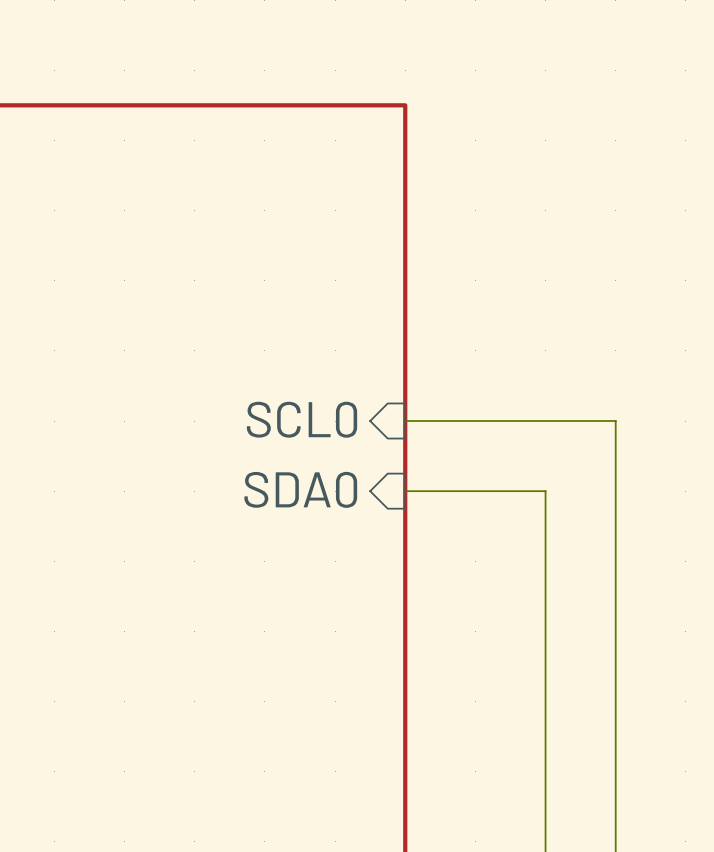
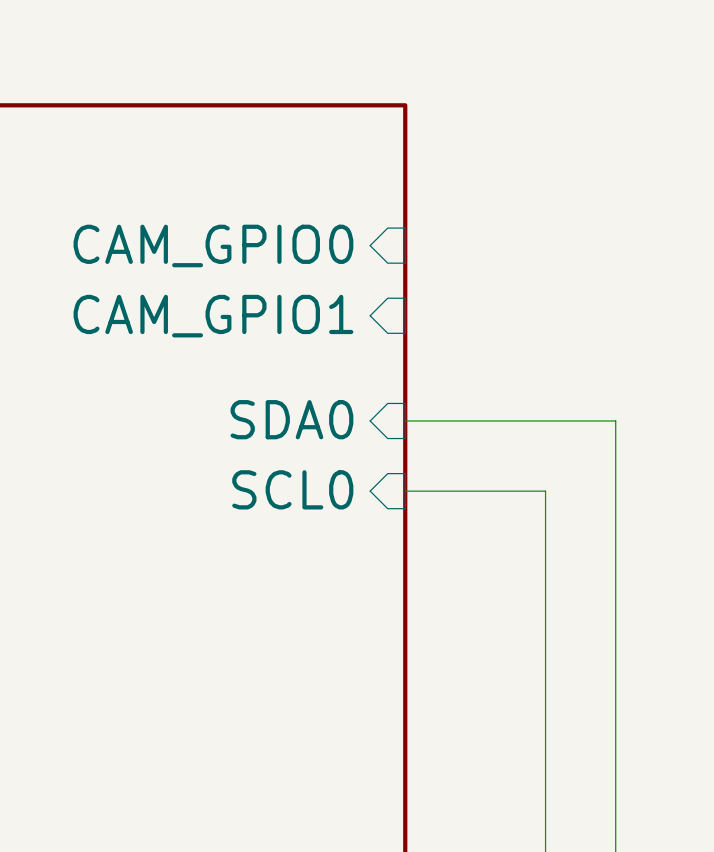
sheet pin: none -> CAM_GPIO0 (213, 245)
sheet pin: none -> CAM_GPIO1 (213, 316)
sheet pin: SCL0 (302, 419) -> SDA0 (291, 419)
sheet pin: SDA0 (300, 489) -> SCL0 (292, 489)

